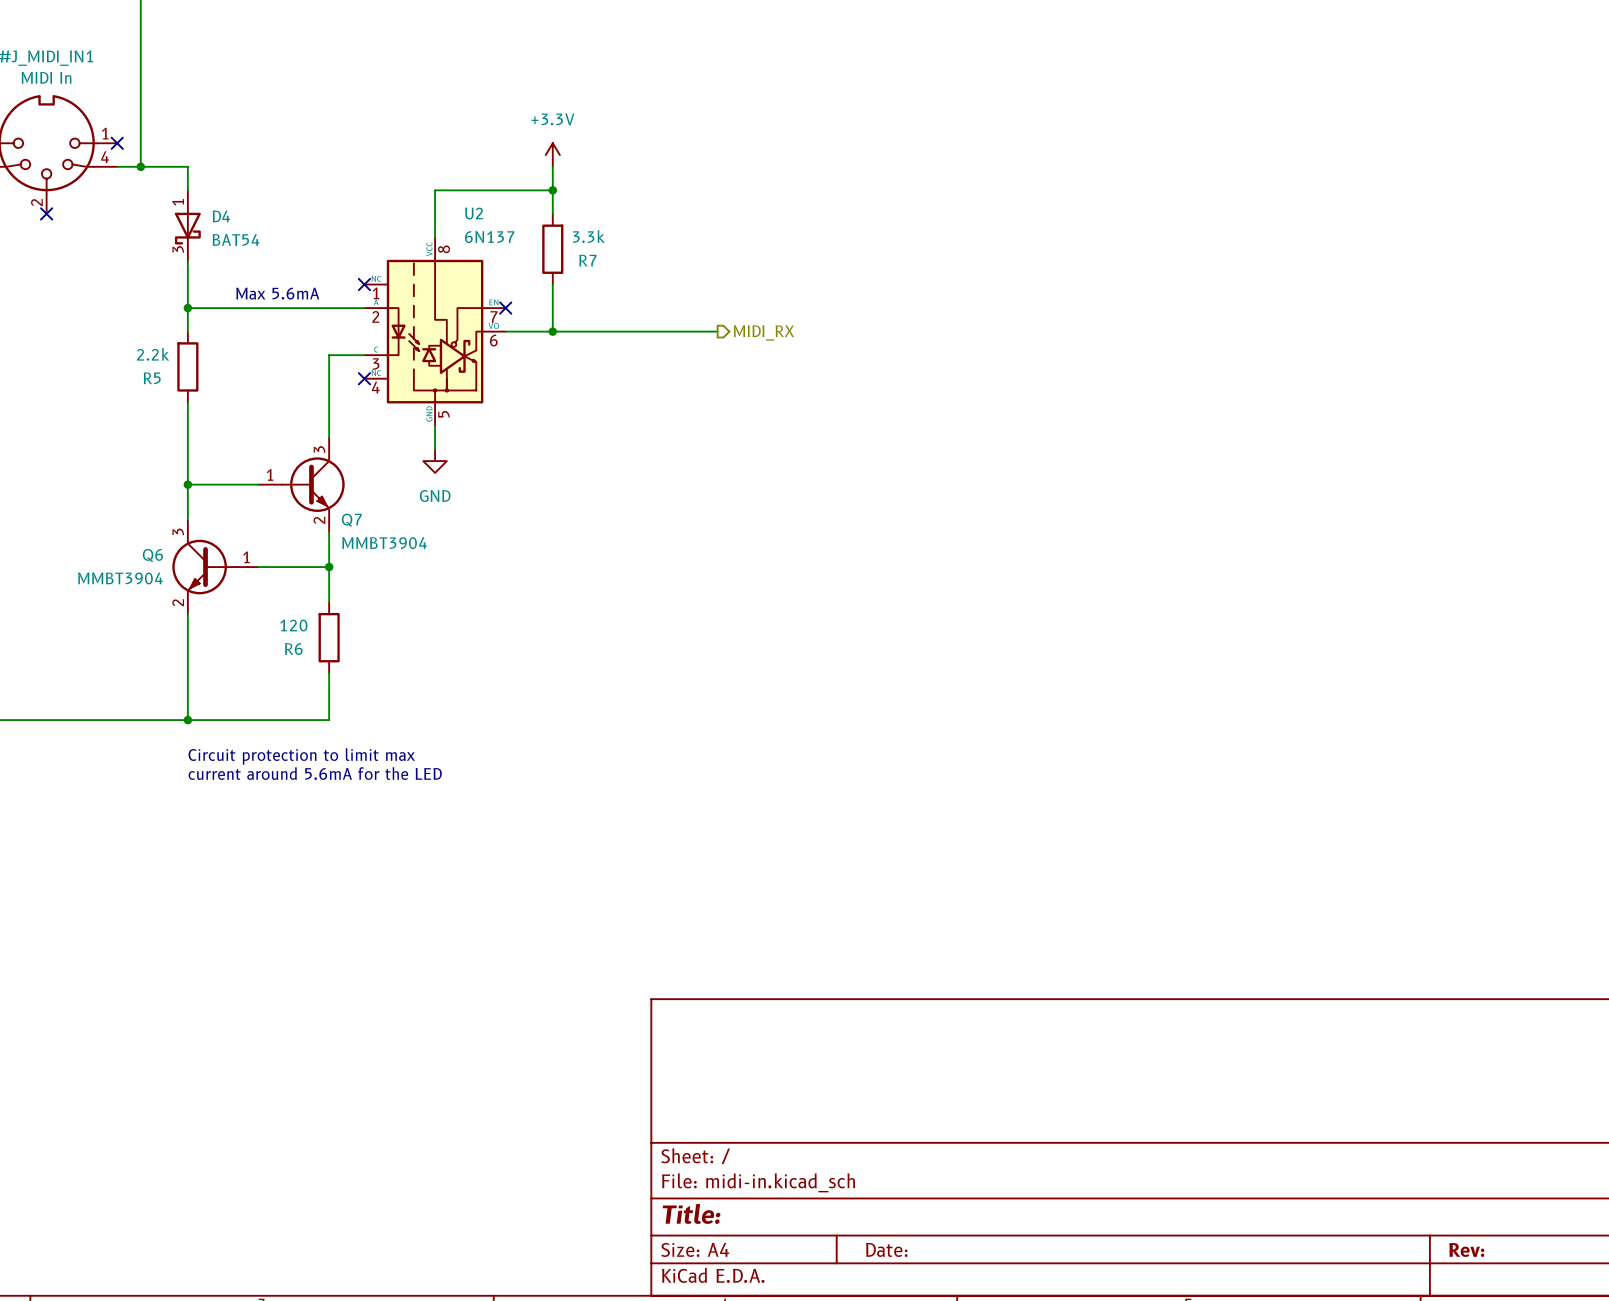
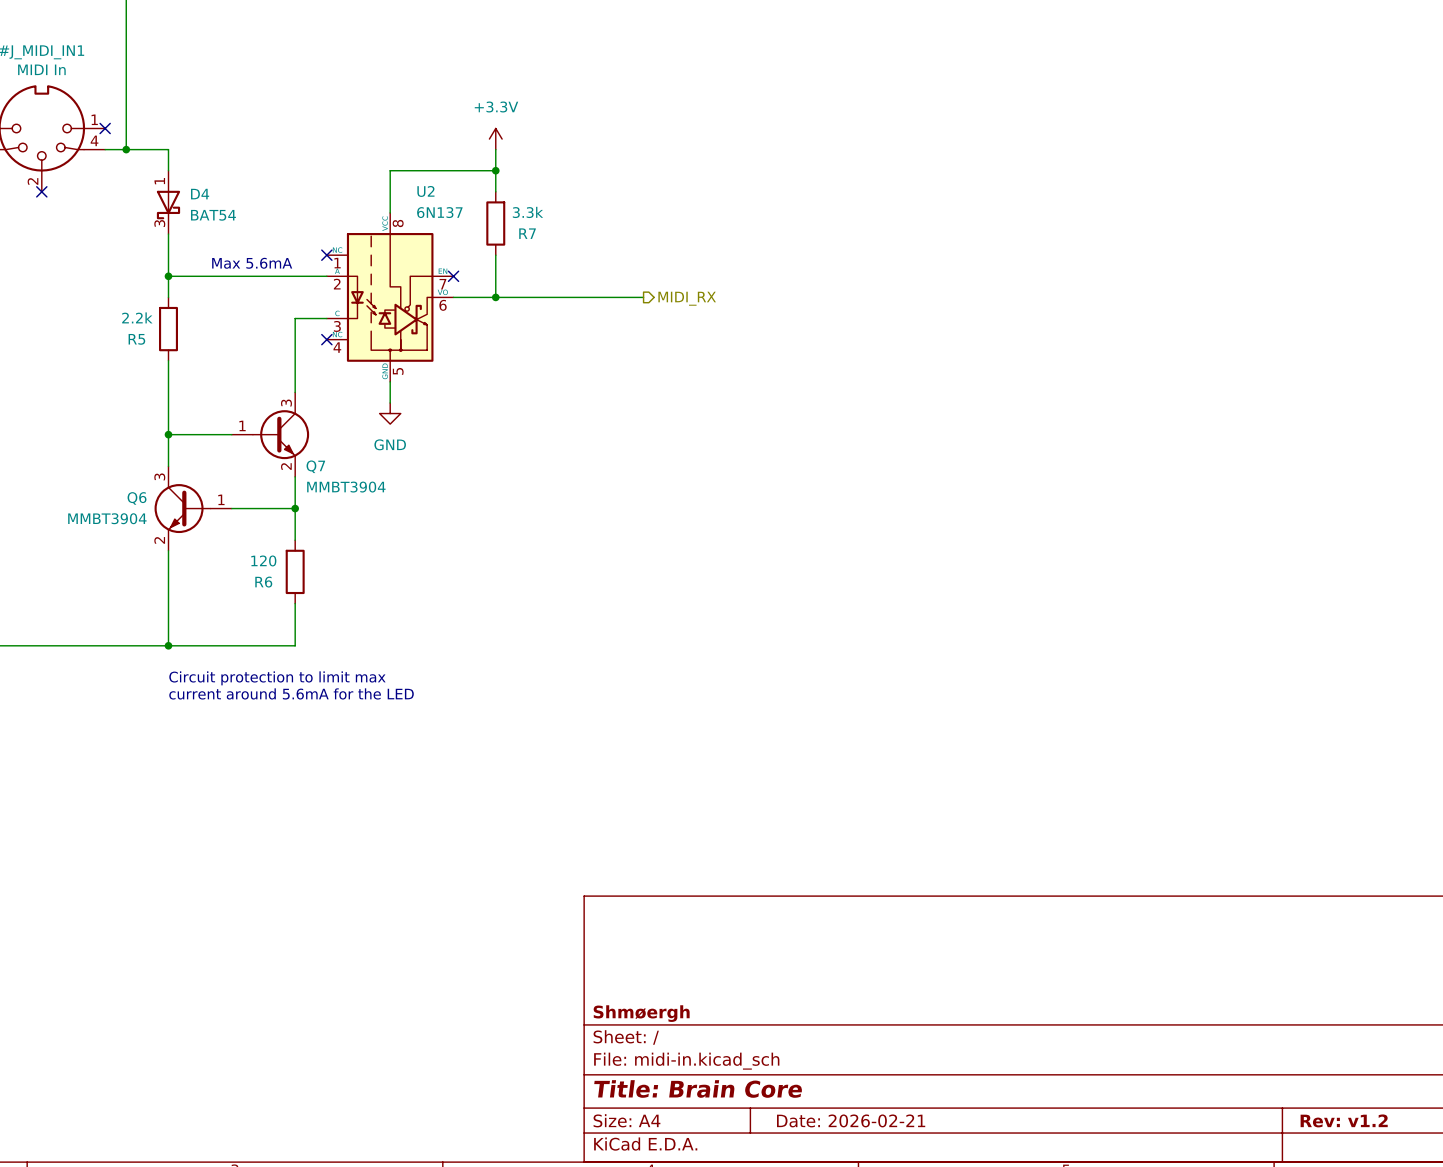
title block: none -> Shmøergh (641, 1013)
title block: Title: (691, 1213) -> Title: Brain Core (698, 1088)
title block: Date: (886, 1249) -> Date: 2026-02-21 (851, 1120)
title block: Rev: (1466, 1250) -> Rev: v1.2 (1344, 1120)

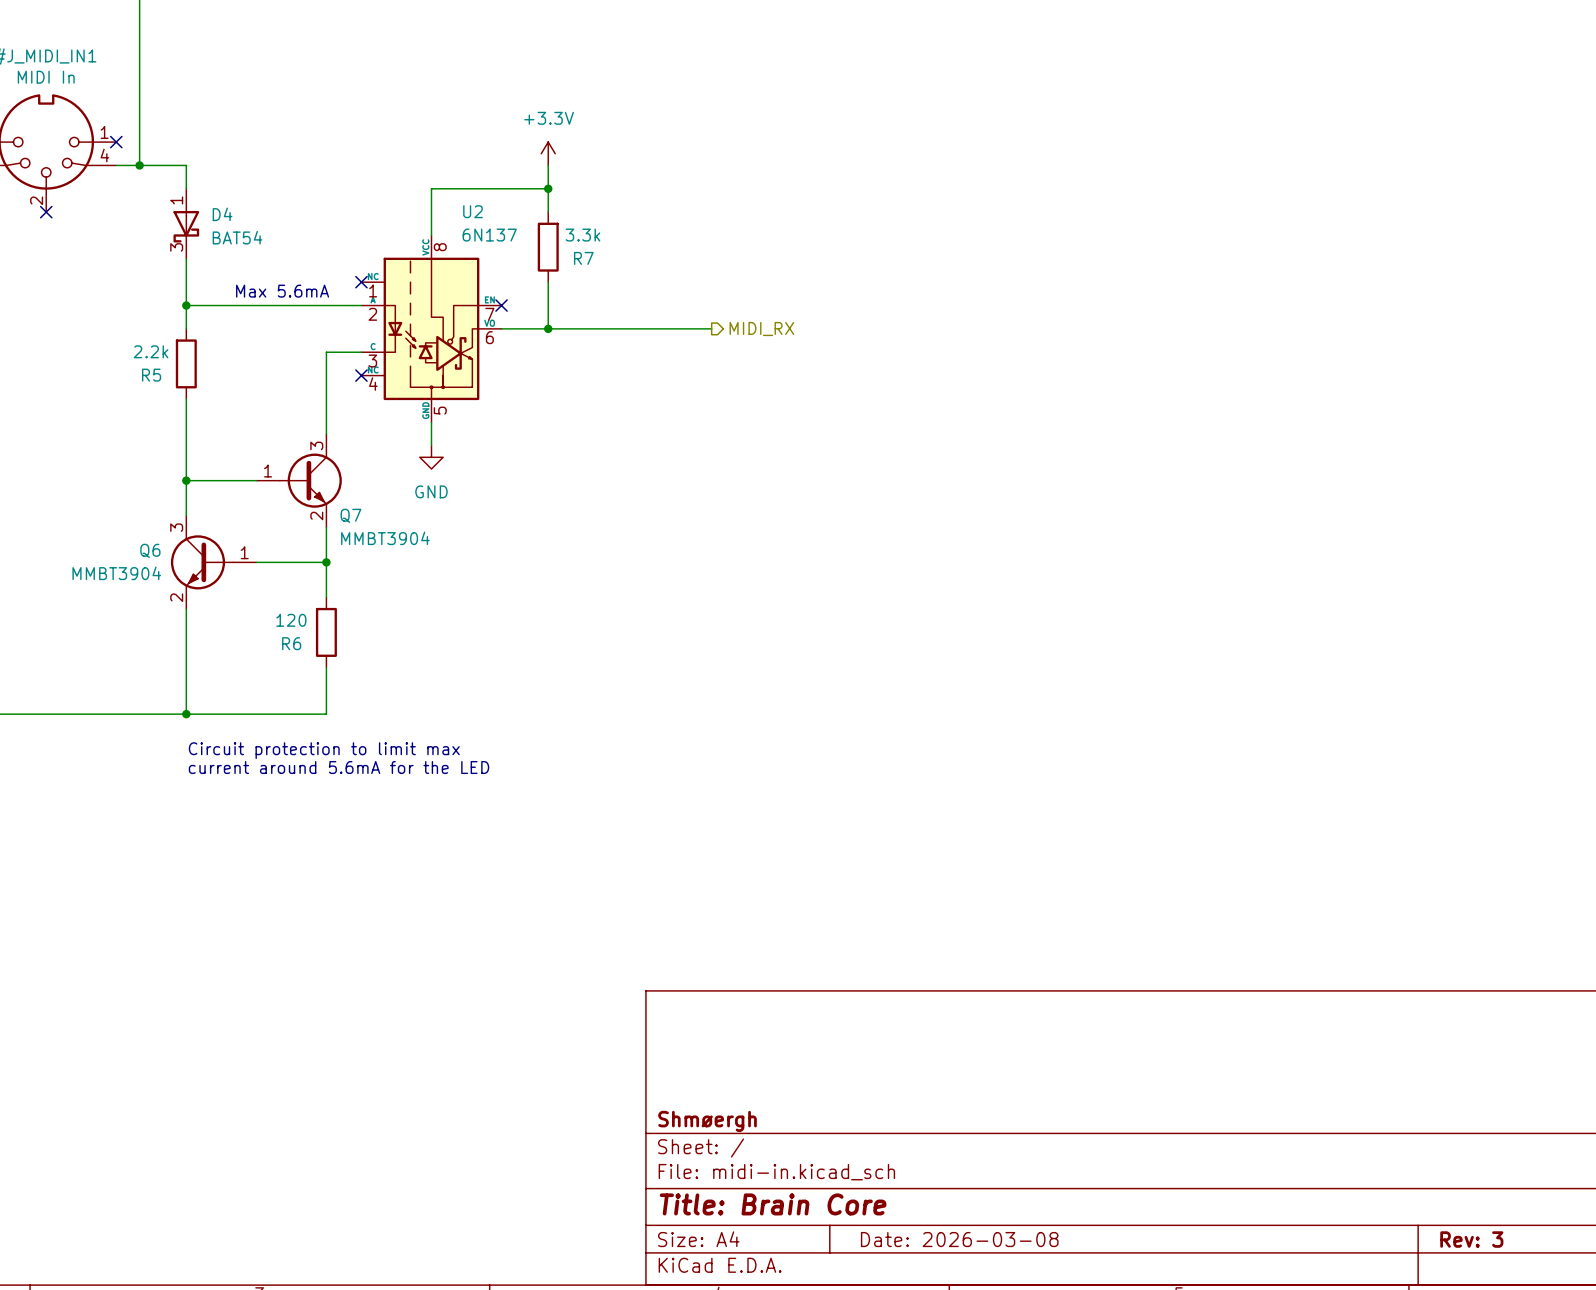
title block: Date: 2026-02-21 (851, 1120) -> Date: 2026-03-08 (959, 1239)
title block: Rev: v1.2 (1344, 1120) -> Rev: 3 (1471, 1239)

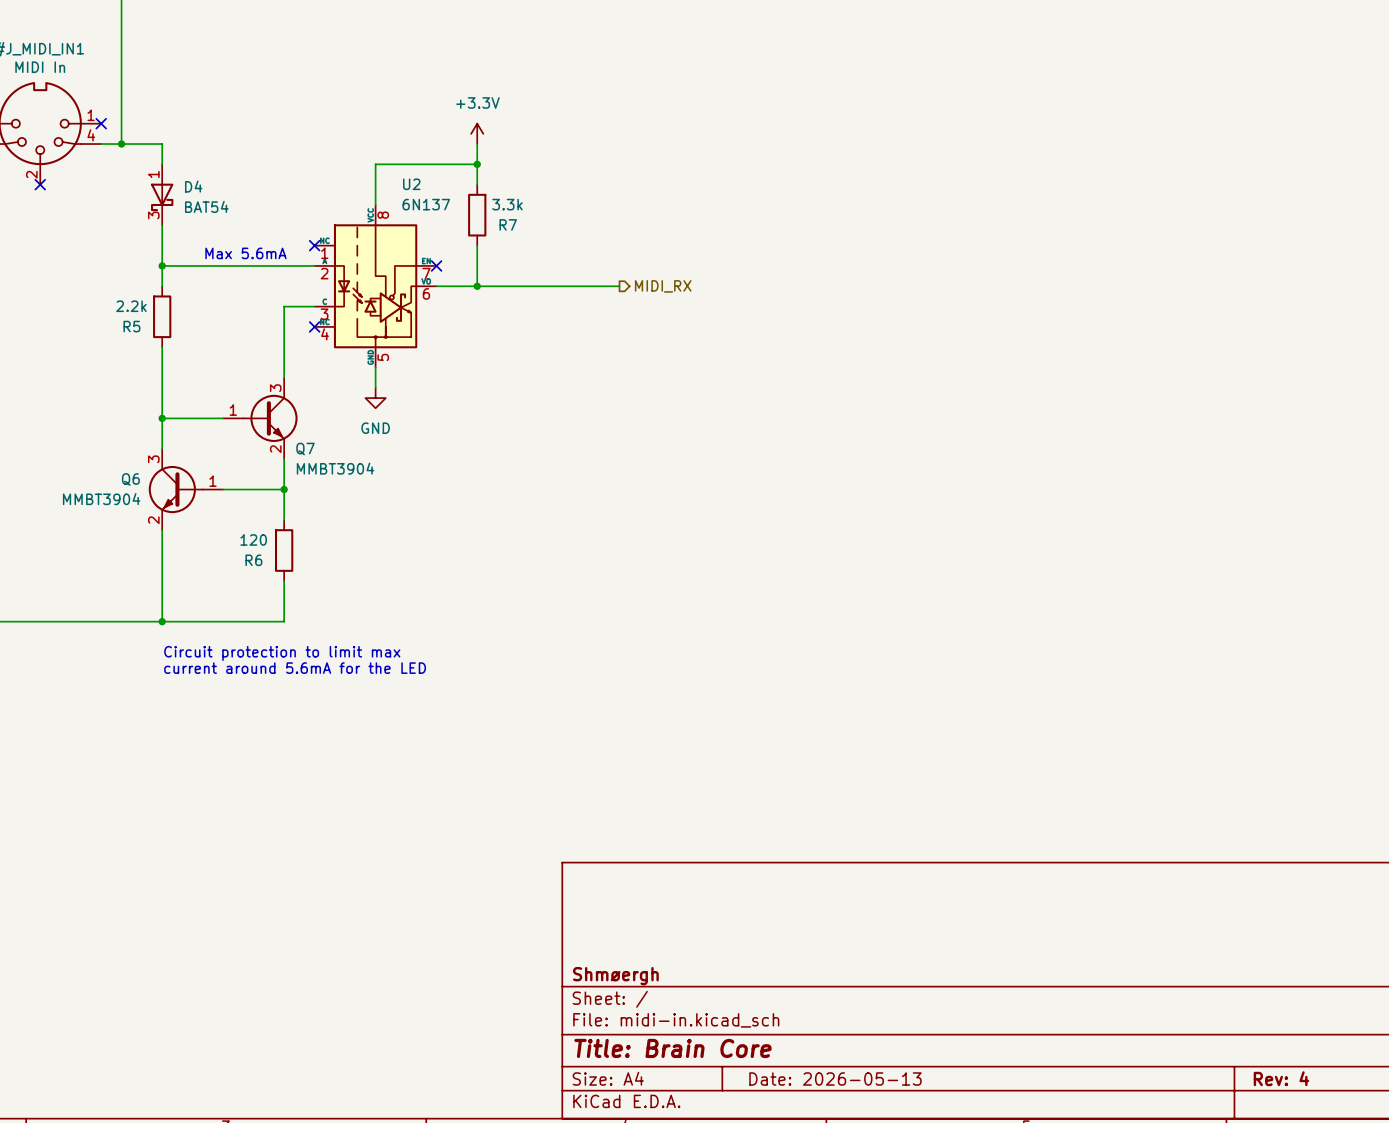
title block: Date: 2026-03-08 (959, 1239) -> Date: 2026-05-13 (835, 1079)
title block: Rev: 3 (1471, 1239) -> Rev: 4 (1281, 1078)

